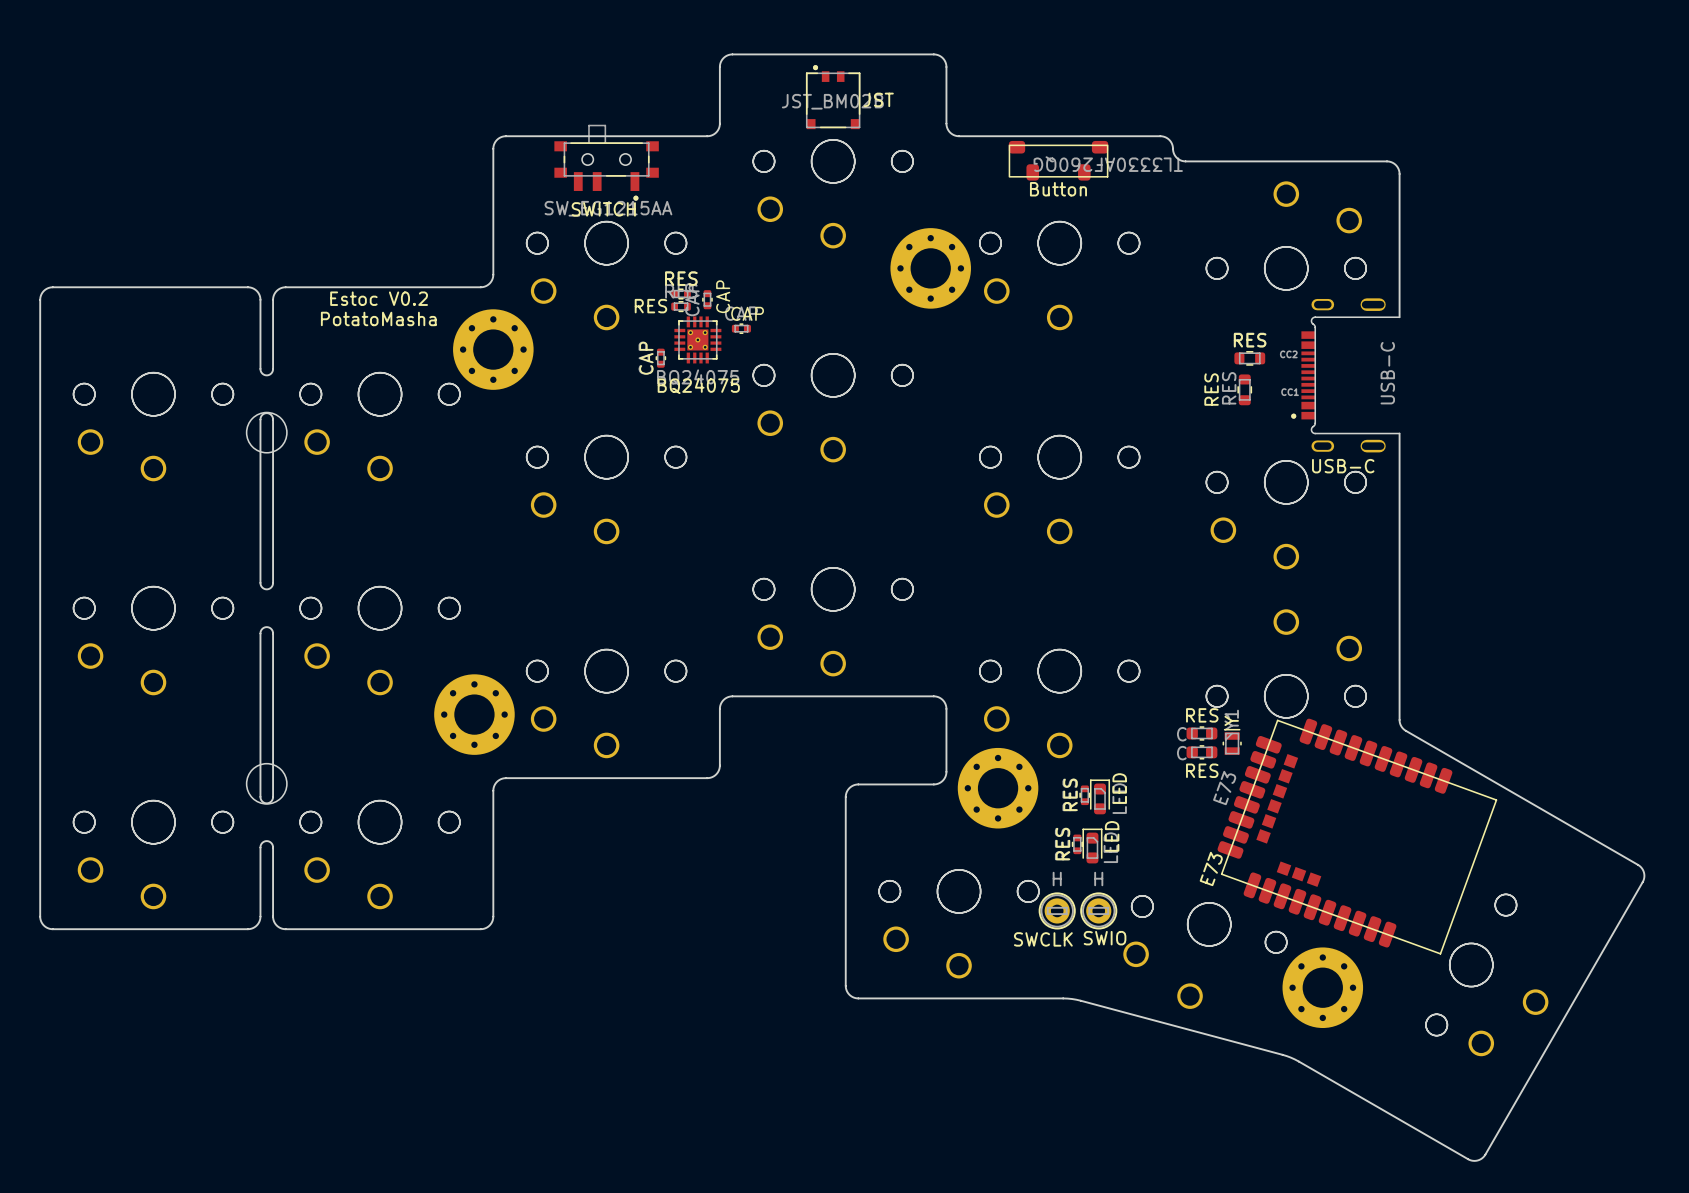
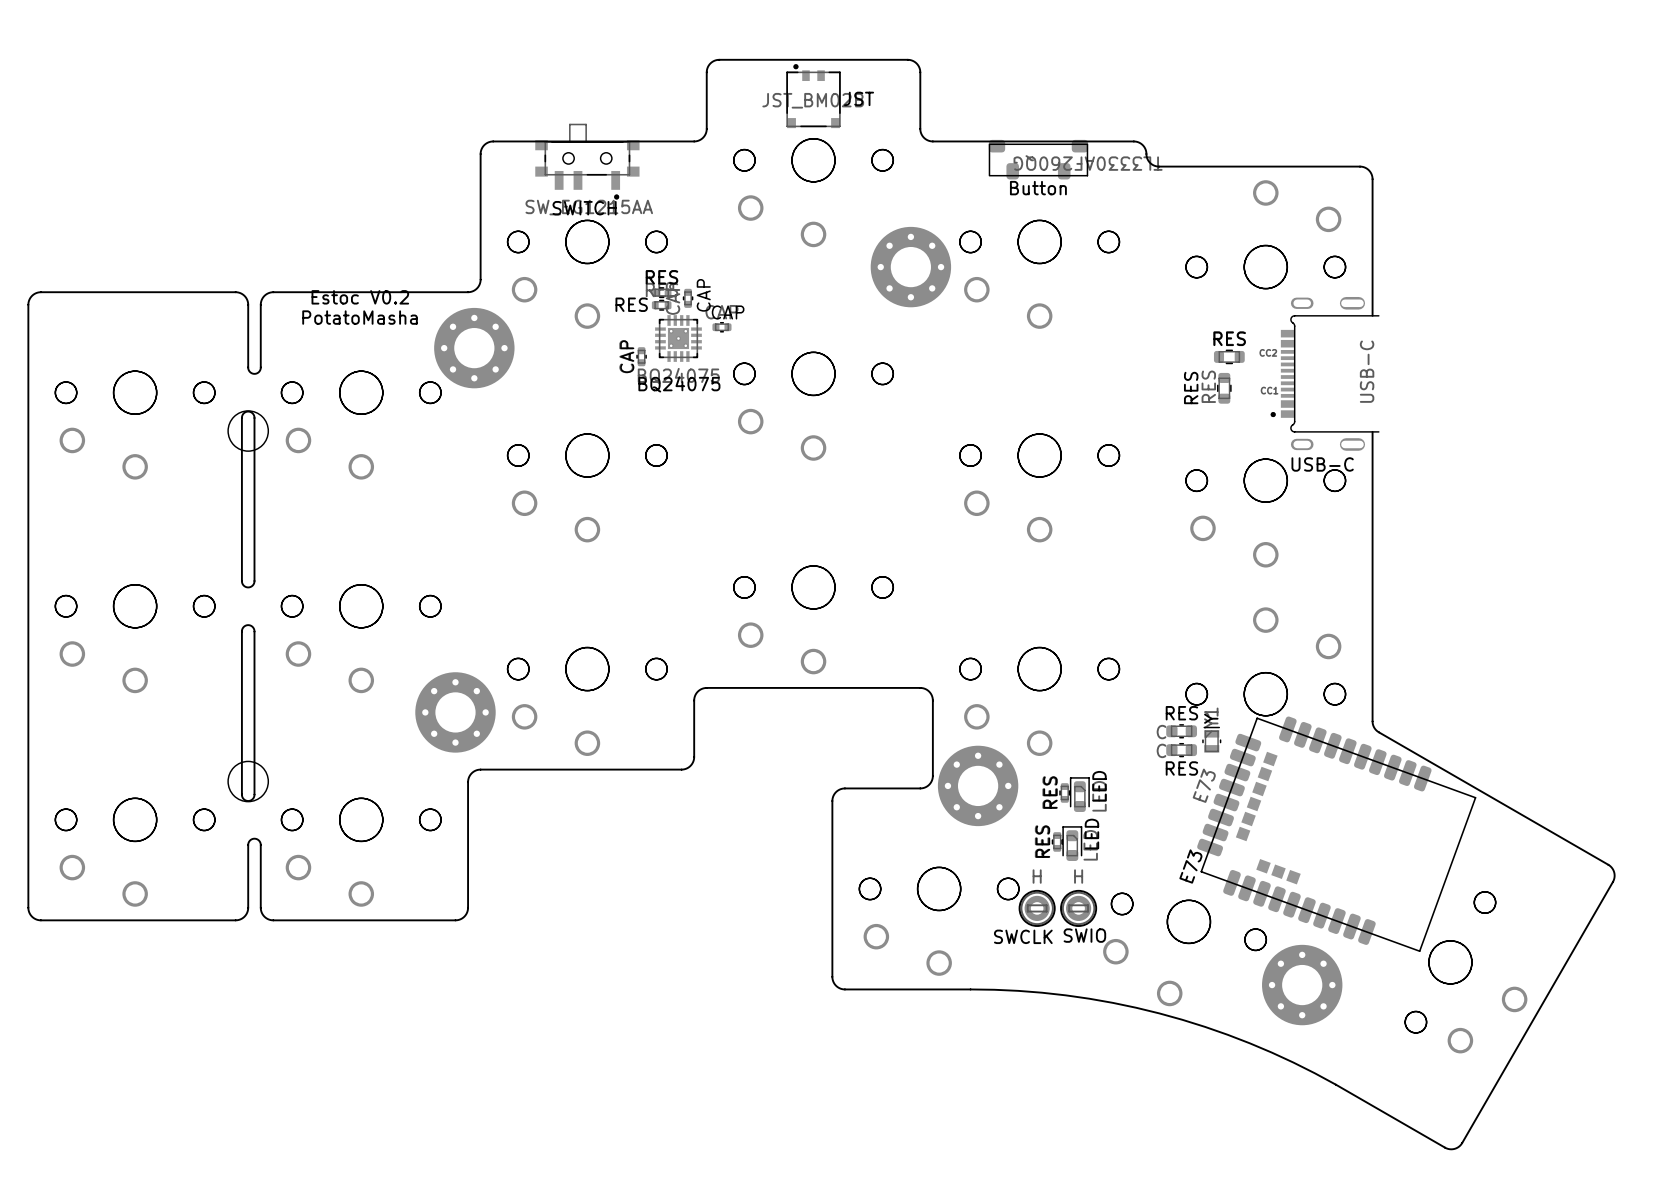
board edge: none -> (1372, 315) (1372, 179) (1370, 172) (1365, 167) (1157, 166) (1148, 160) (1143, 146) (1135, 141) (930, 141) (923, 137) (920, 130) (920, 69) (915, 62) (907, 59) (715, 60) (709, 64) (706, 70) (706, 131) (703, 137) (696, 141) (487, 142) (482, 147) (480, 152) (480, 279) (476, 288) (468, 292) (268, 293) (263, 297) (260, 303) (260, 368) (256, 373) (251, 373) (248, 368) (248, 303) (245, 296) (239, 292) (35, 293) (30, 298) (28, 304) (29, 911) (33, 917) (40, 920) (238, 919) (244, 916) (248, 909) (248, 844) (250, 840) (254, 838) (258, 840) (260, 844) (261, 910) (264, 916) (269, 919) (458, 920) (464, 916) (467, 909) (468, 782) (469, 775) (475, 770) (685, 768) (691, 764) (694, 758) (694, 697) (697, 691) (703, 688) (921, 688) (929, 691) (932, 699) (932, 775) (930, 783) (920, 788) (843, 788) (837, 791) (832, 798) (832, 976) (837, 986) (844, 989) (994, 989) (1042, 992) (1089, 998) (1159, 1013) (1227, 1034) (1271, 1052) (1335, 1084) (1445, 1147) (1456, 1148) (1462, 1143) (1612, 882) (1614, 873) (1608, 864) (1378, 732) (1374, 727) (1372, 721) (1372, 431)
board edge: (1399, 317) (1399, 173) (1397, 167) (1393, 163) (1386, 161) (1184, 161) (1174, 155) (1169, 139) (1161, 136) (956, 135) (950, 132) (946, 125) (946, 64) (941, 57) (933, 54) (729, 54) (723, 58) (720, 64) (719, 125) (717, 131) (711, 135) (500, 137) (496, 140) (493, 147) (493, 274) (489, 283) (480, 287) (281, 287) (275, 292) (273, 298) (273, 369) (268, 375) (263, 374) (260, 370) (260, 298) (257, 292) (252, 287) (52, 287) (46, 289) (41, 294) (40, 916) (42, 923) (47, 927) (252, 928) (257, 924) (260, 918) (260, 846) (262, 842) (266, 841) (270, 842) (273, 846) (273, 918) (275, 924) (281, 928) (483, 928) (489, 925) (493, 918) (493, 790) (495, 784) (499, 779) (505, 778) (712, 777) (717, 773) (719, 767) (720, 705) (723, 700) (730, 696) (933, 696) -> none
board edge: (1399, 433) (1399, 719) (1401, 726) (1405, 730) (1638, 864) (1644, 873) (1642, 882) (1485, 1154) (1480, 1159) (1474, 1160) (1468, 1159) (1291, 1057) (1080, 1000) (1063, 998) (858, 998) (850, 995) (845, 985) (846, 794) (850, 787) (856, 784) (933, 784) (942, 780) (946, 771) (946, 707) (941, 699) (933, 696) -> none

